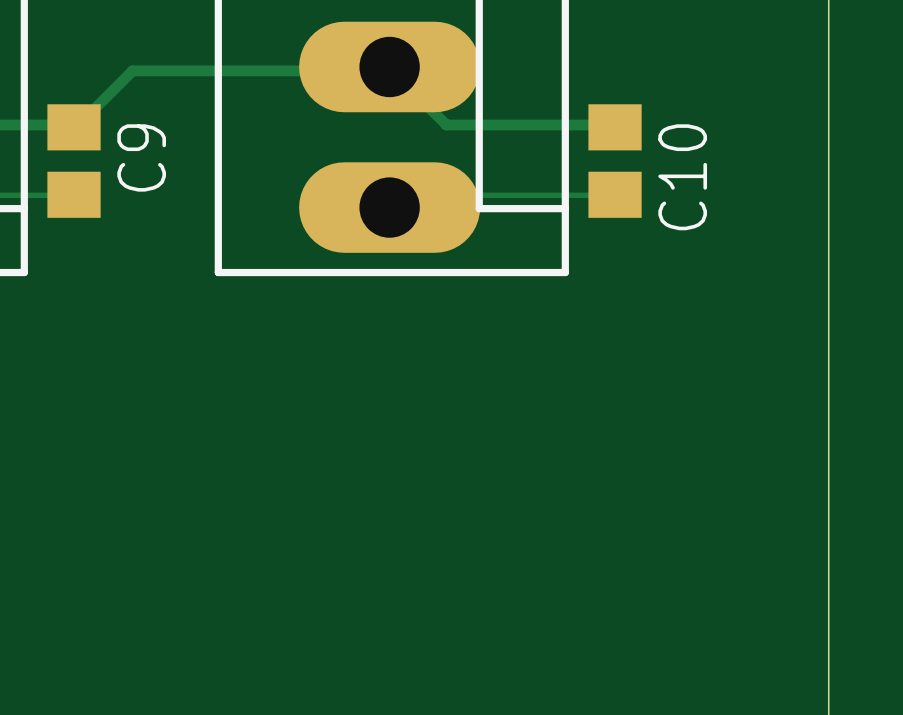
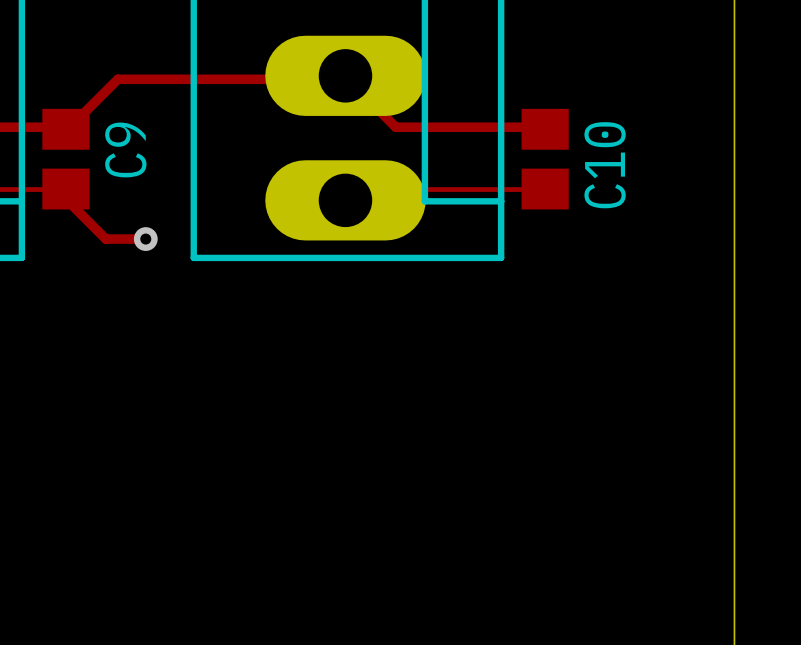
track: none -> (65, 199) (105, 239) (145, 239)
via: none -> (145, 239)

